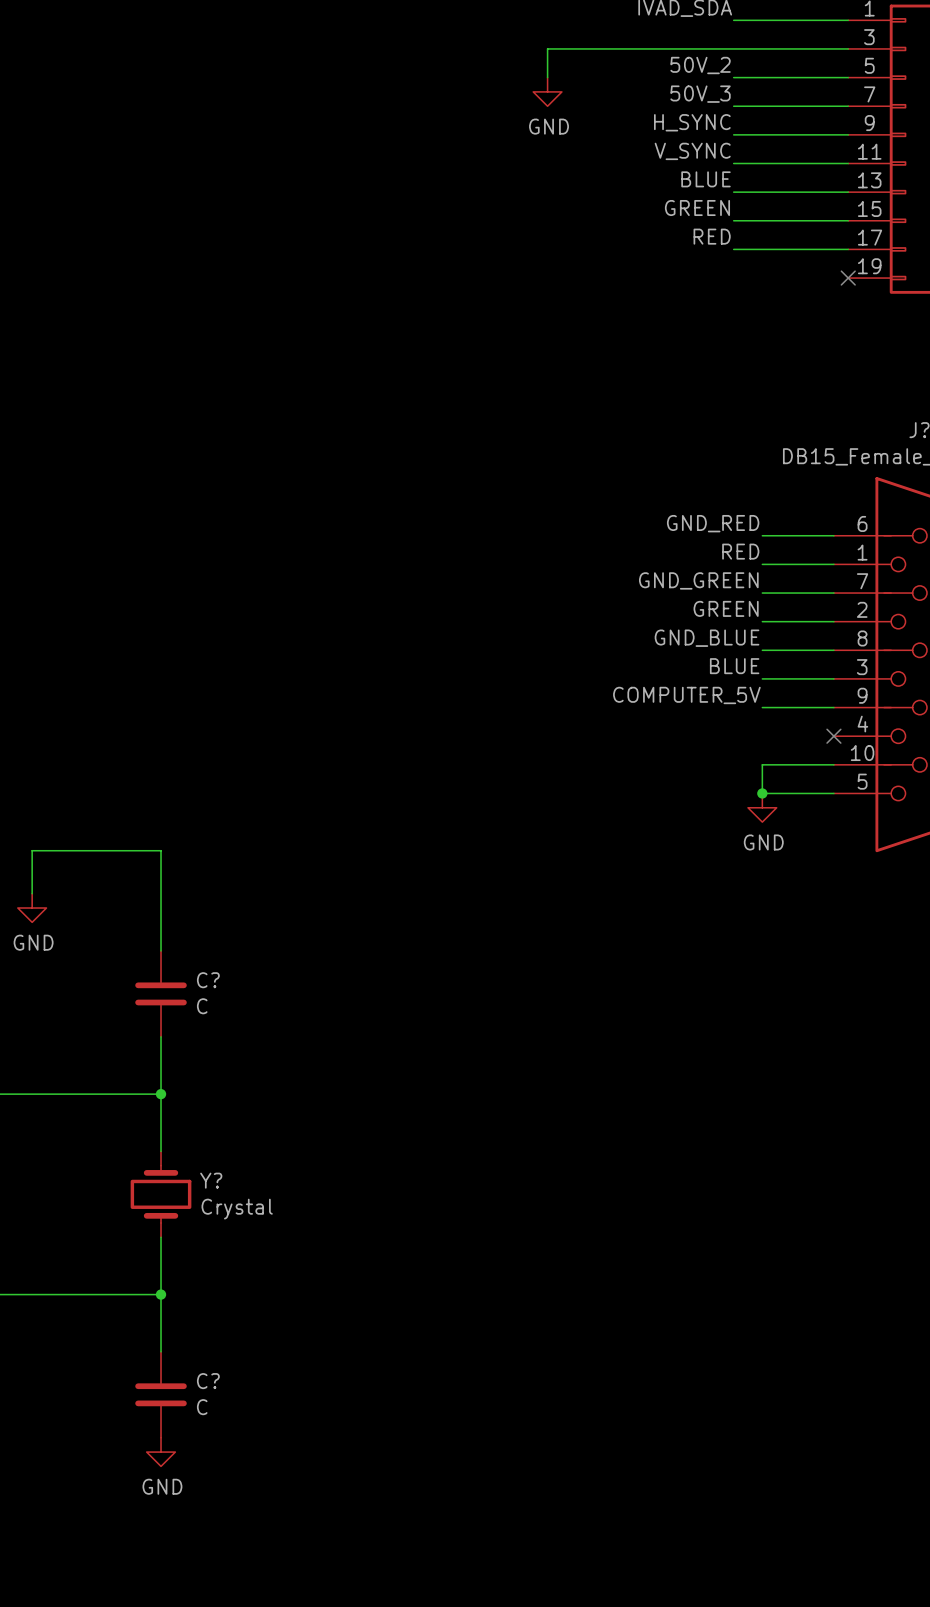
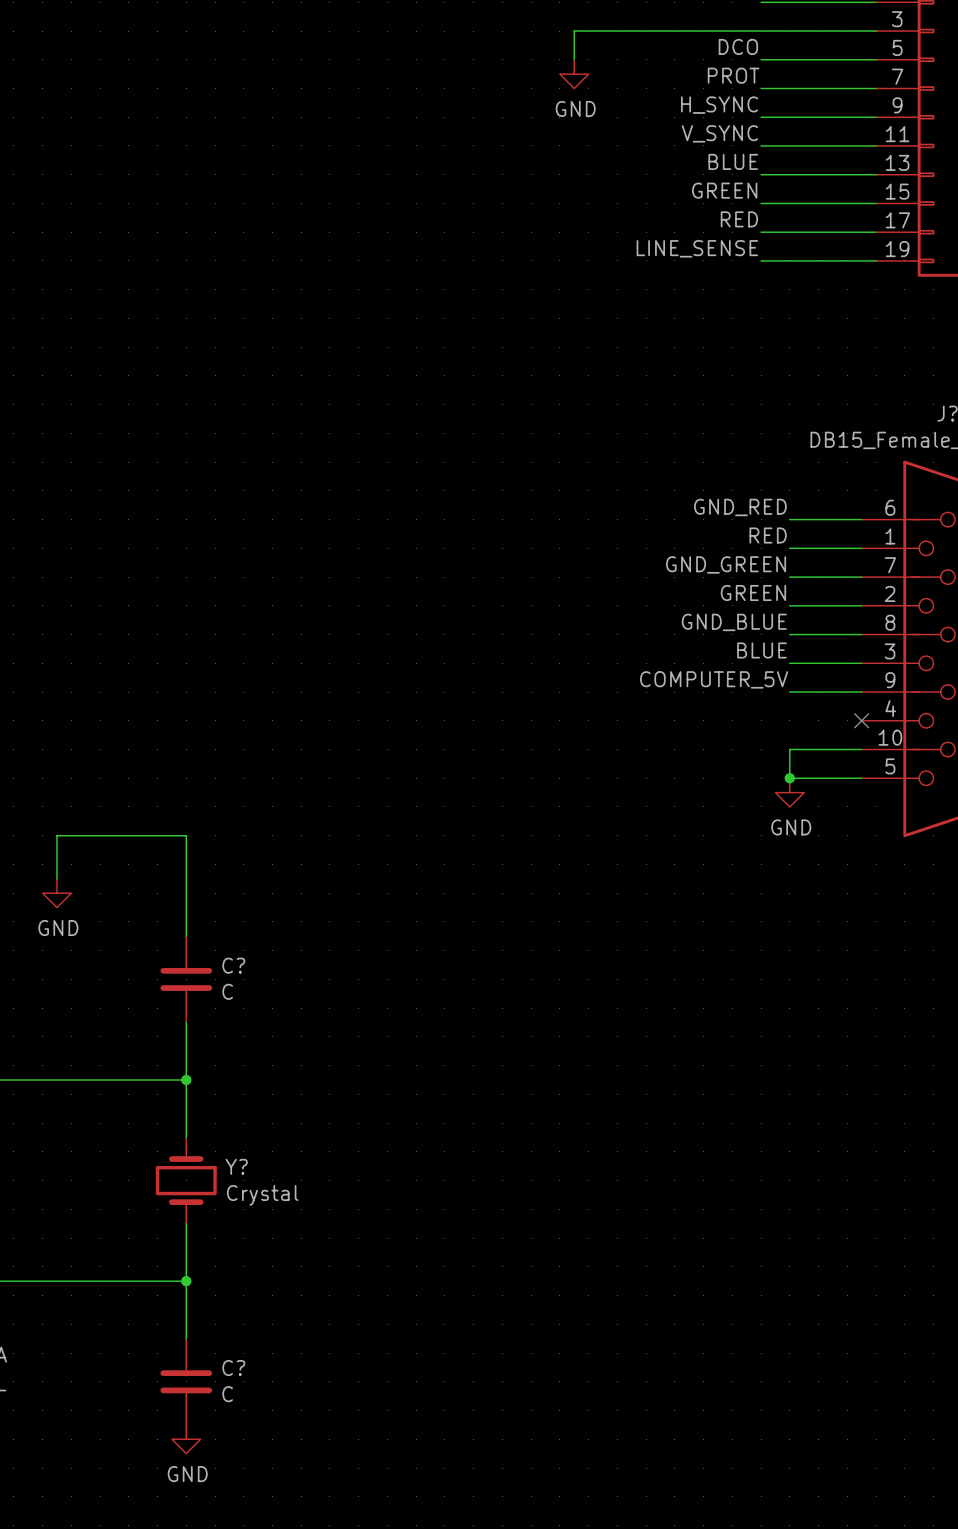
label: 50V_2 (700, 65) -> DCO (738, 46)
label: 50V_3 (700, 94) -> PROT (733, 75)
label: none -> LINE_SENSE (697, 248)
wire: none -> (761, 260) (876, 260)
no-connect mark: (848, 278) -> none

